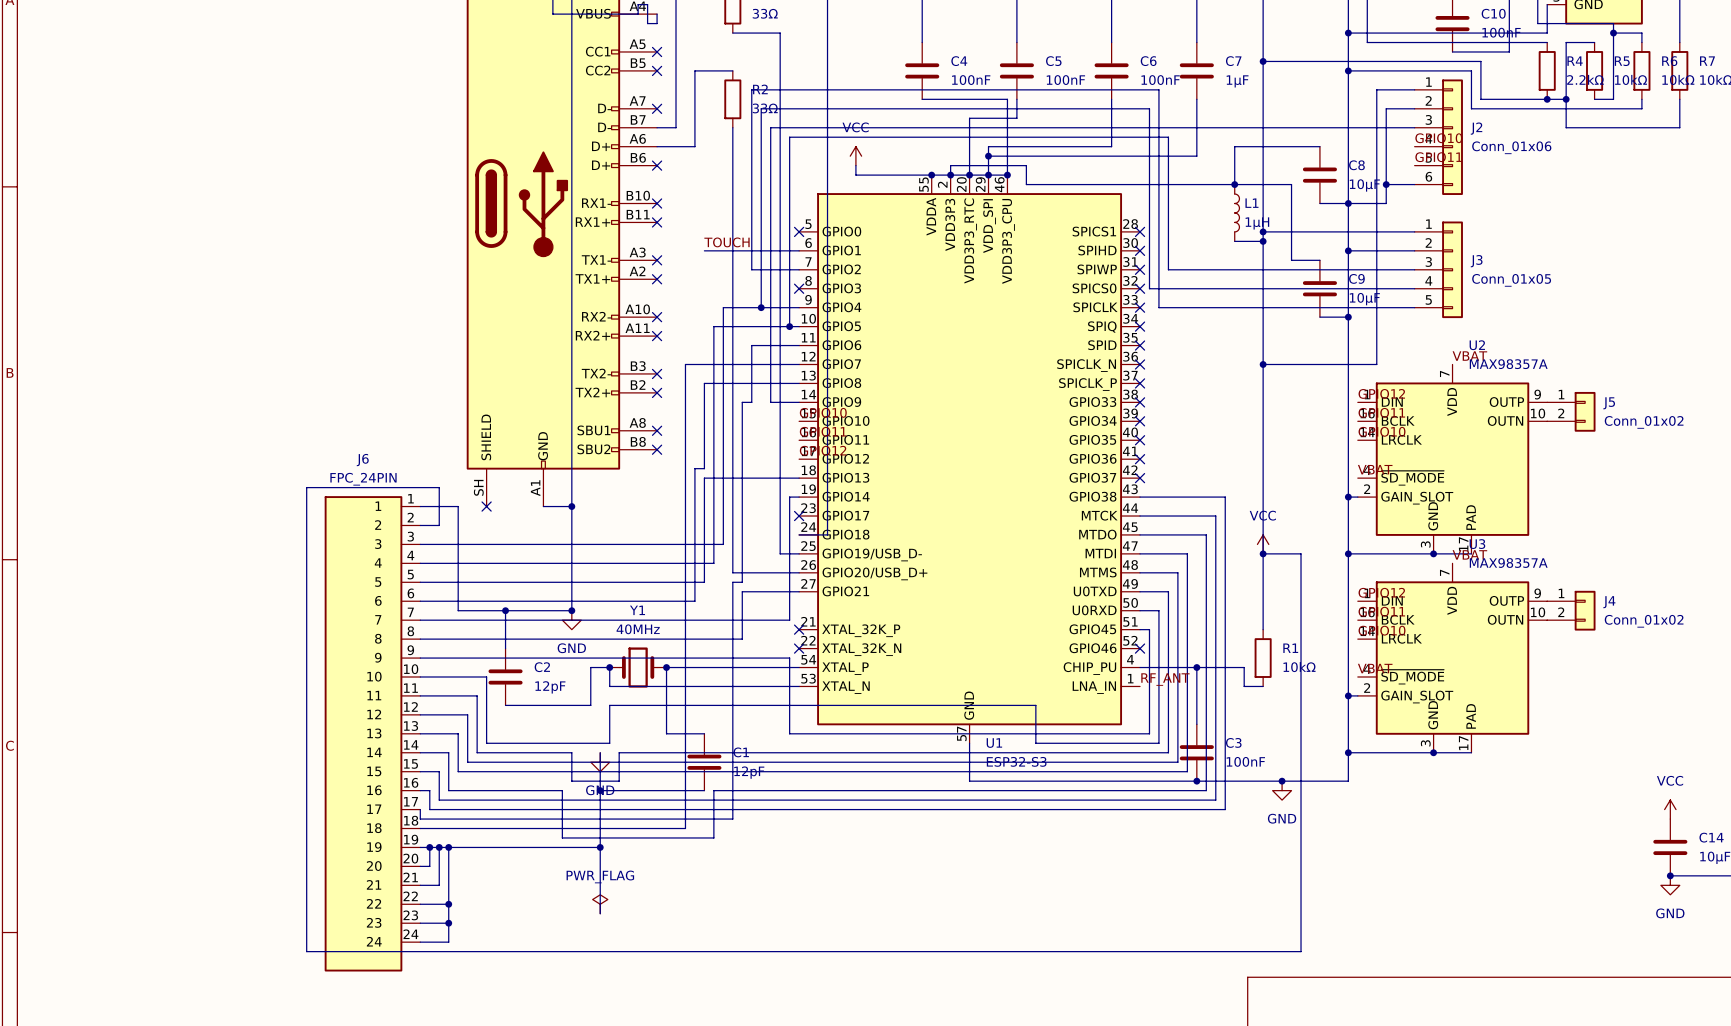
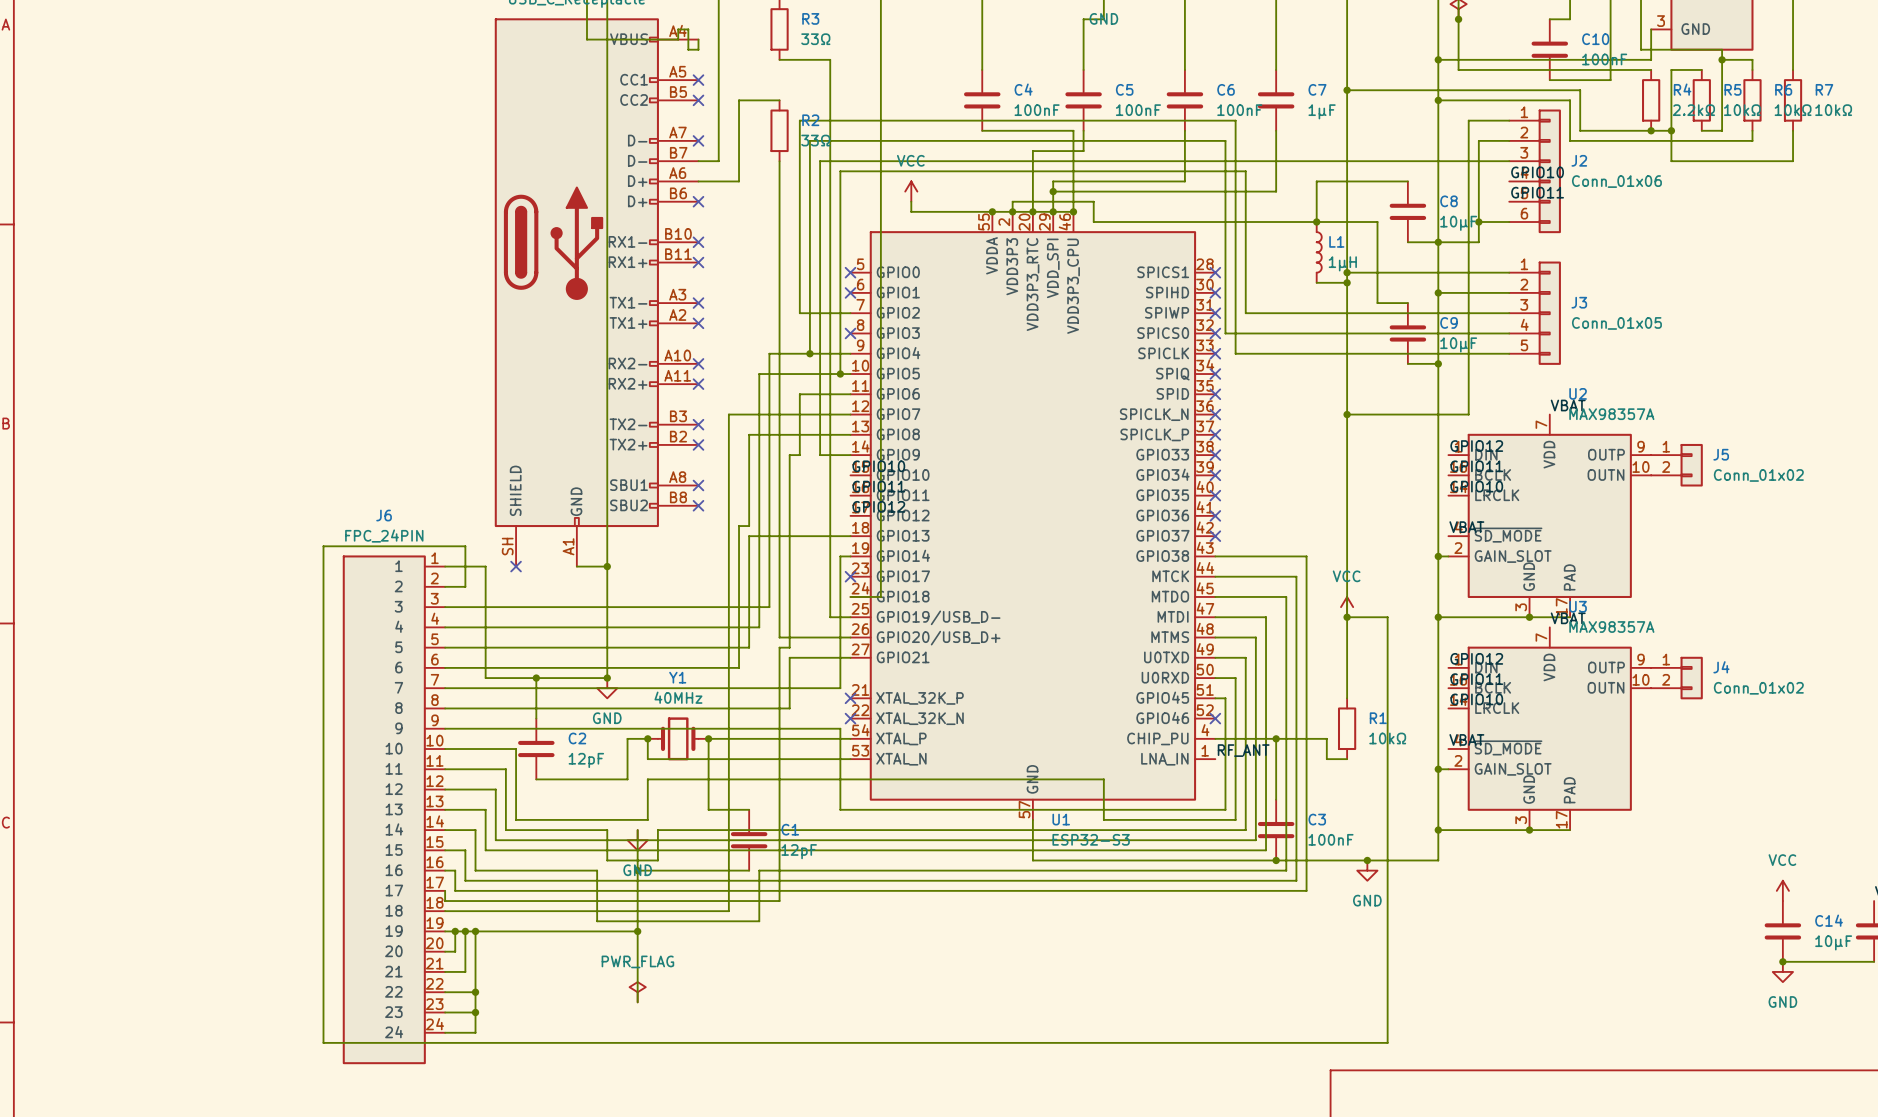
label: TOUCH (727, 242) -> none
wire: (704, 250) (799, 250) -> none
no-connect mark: none -> (850, 292)

